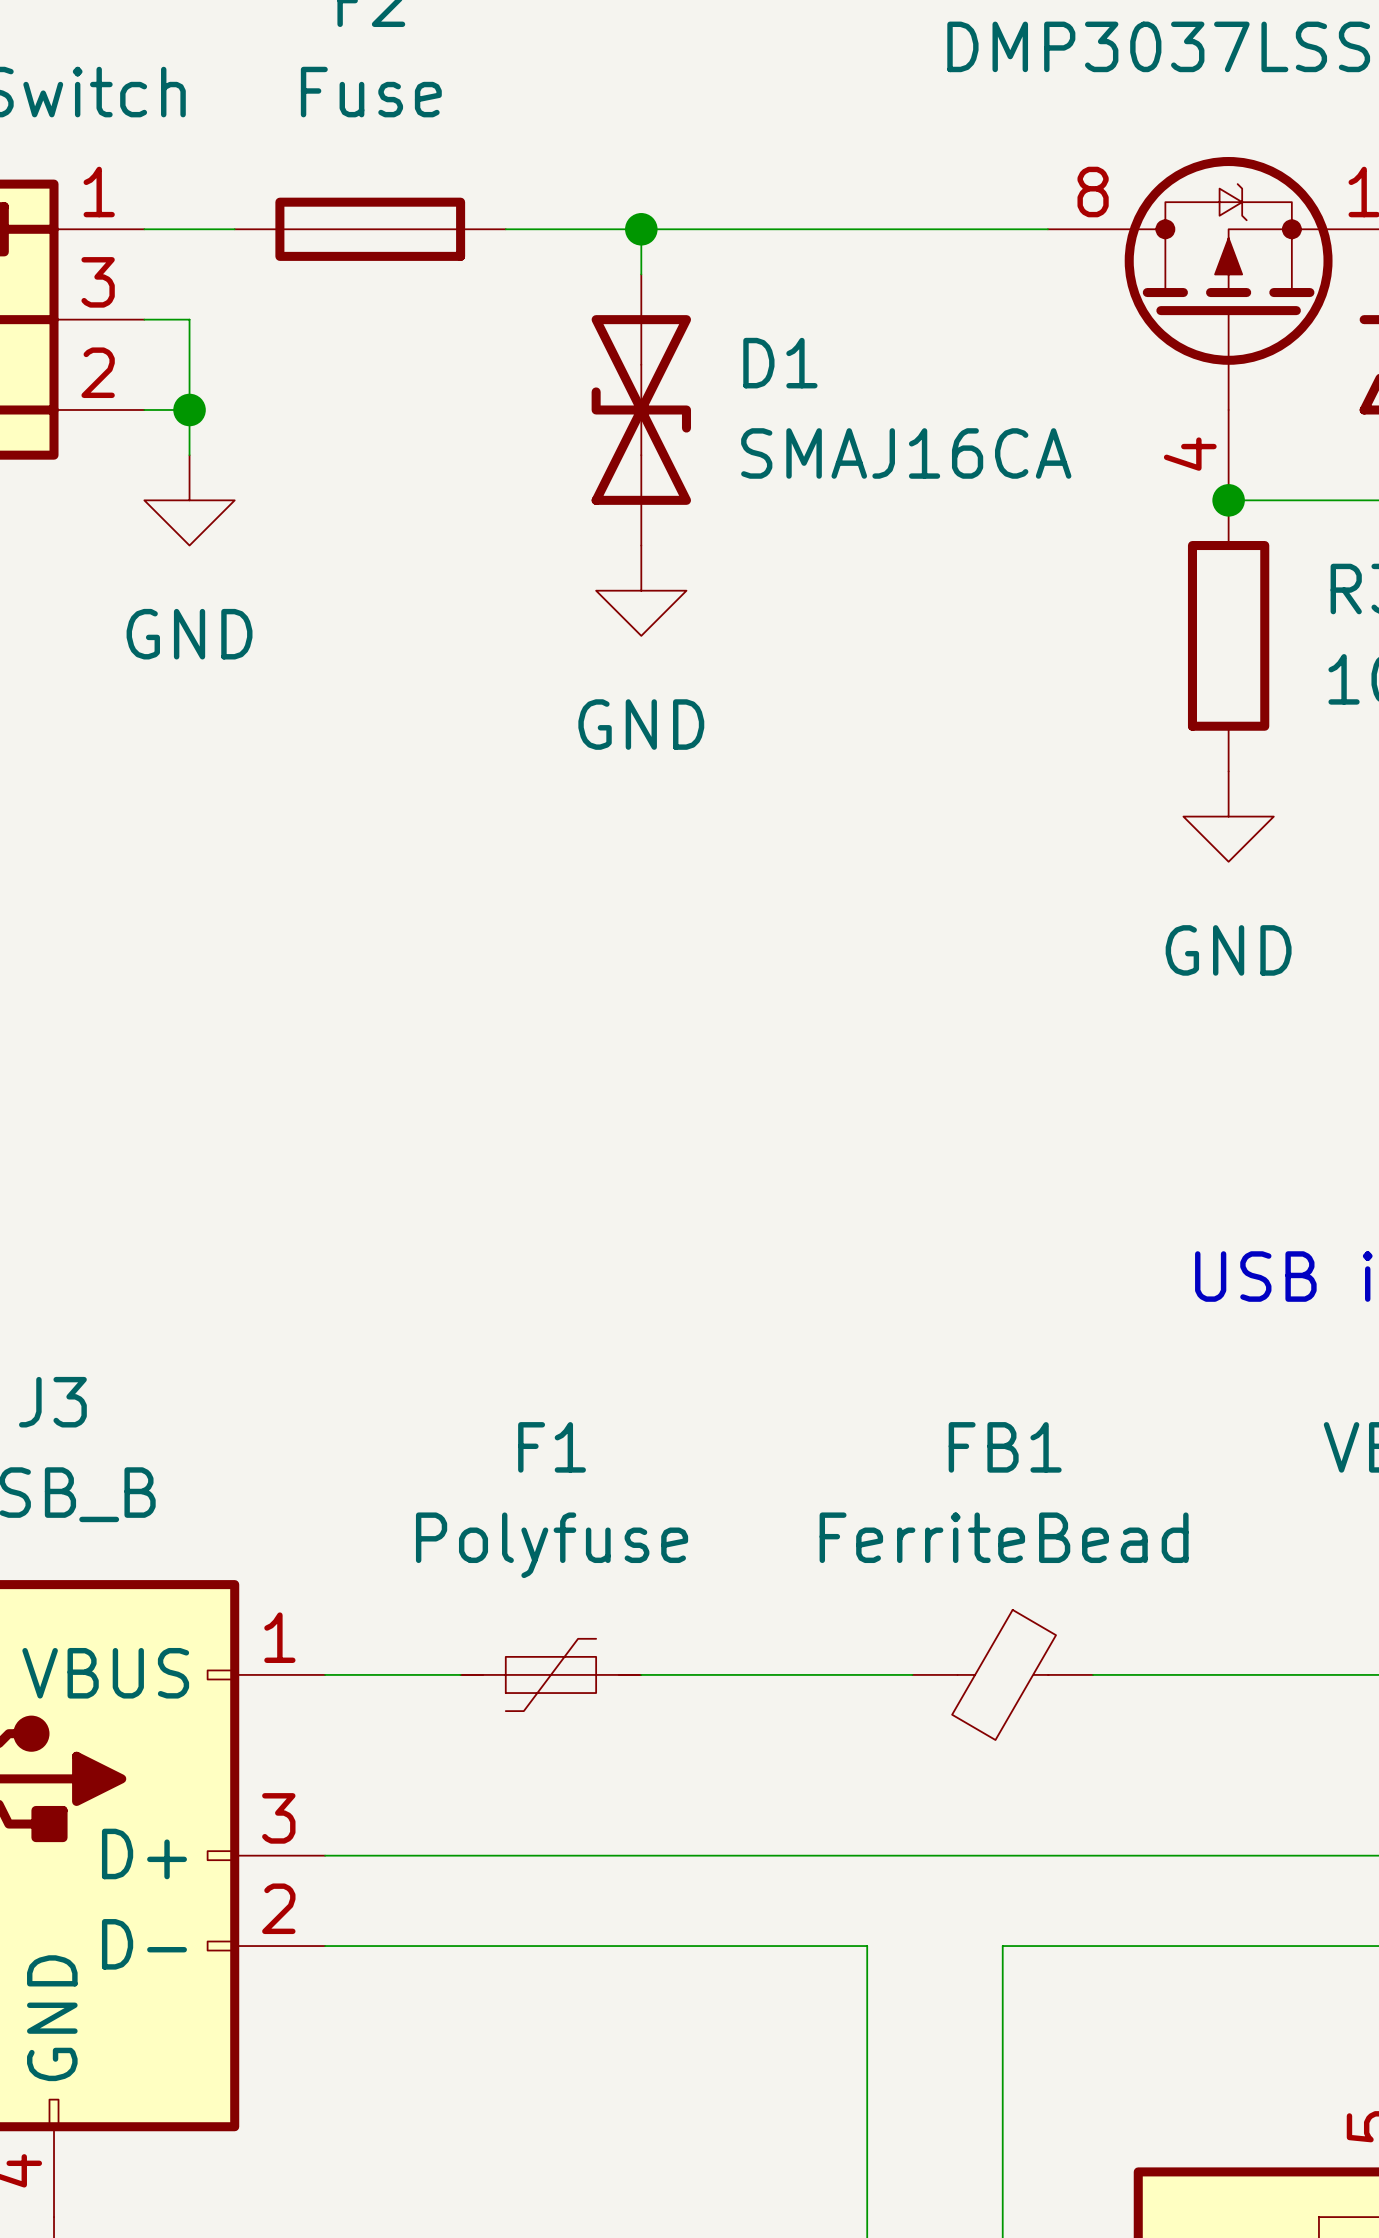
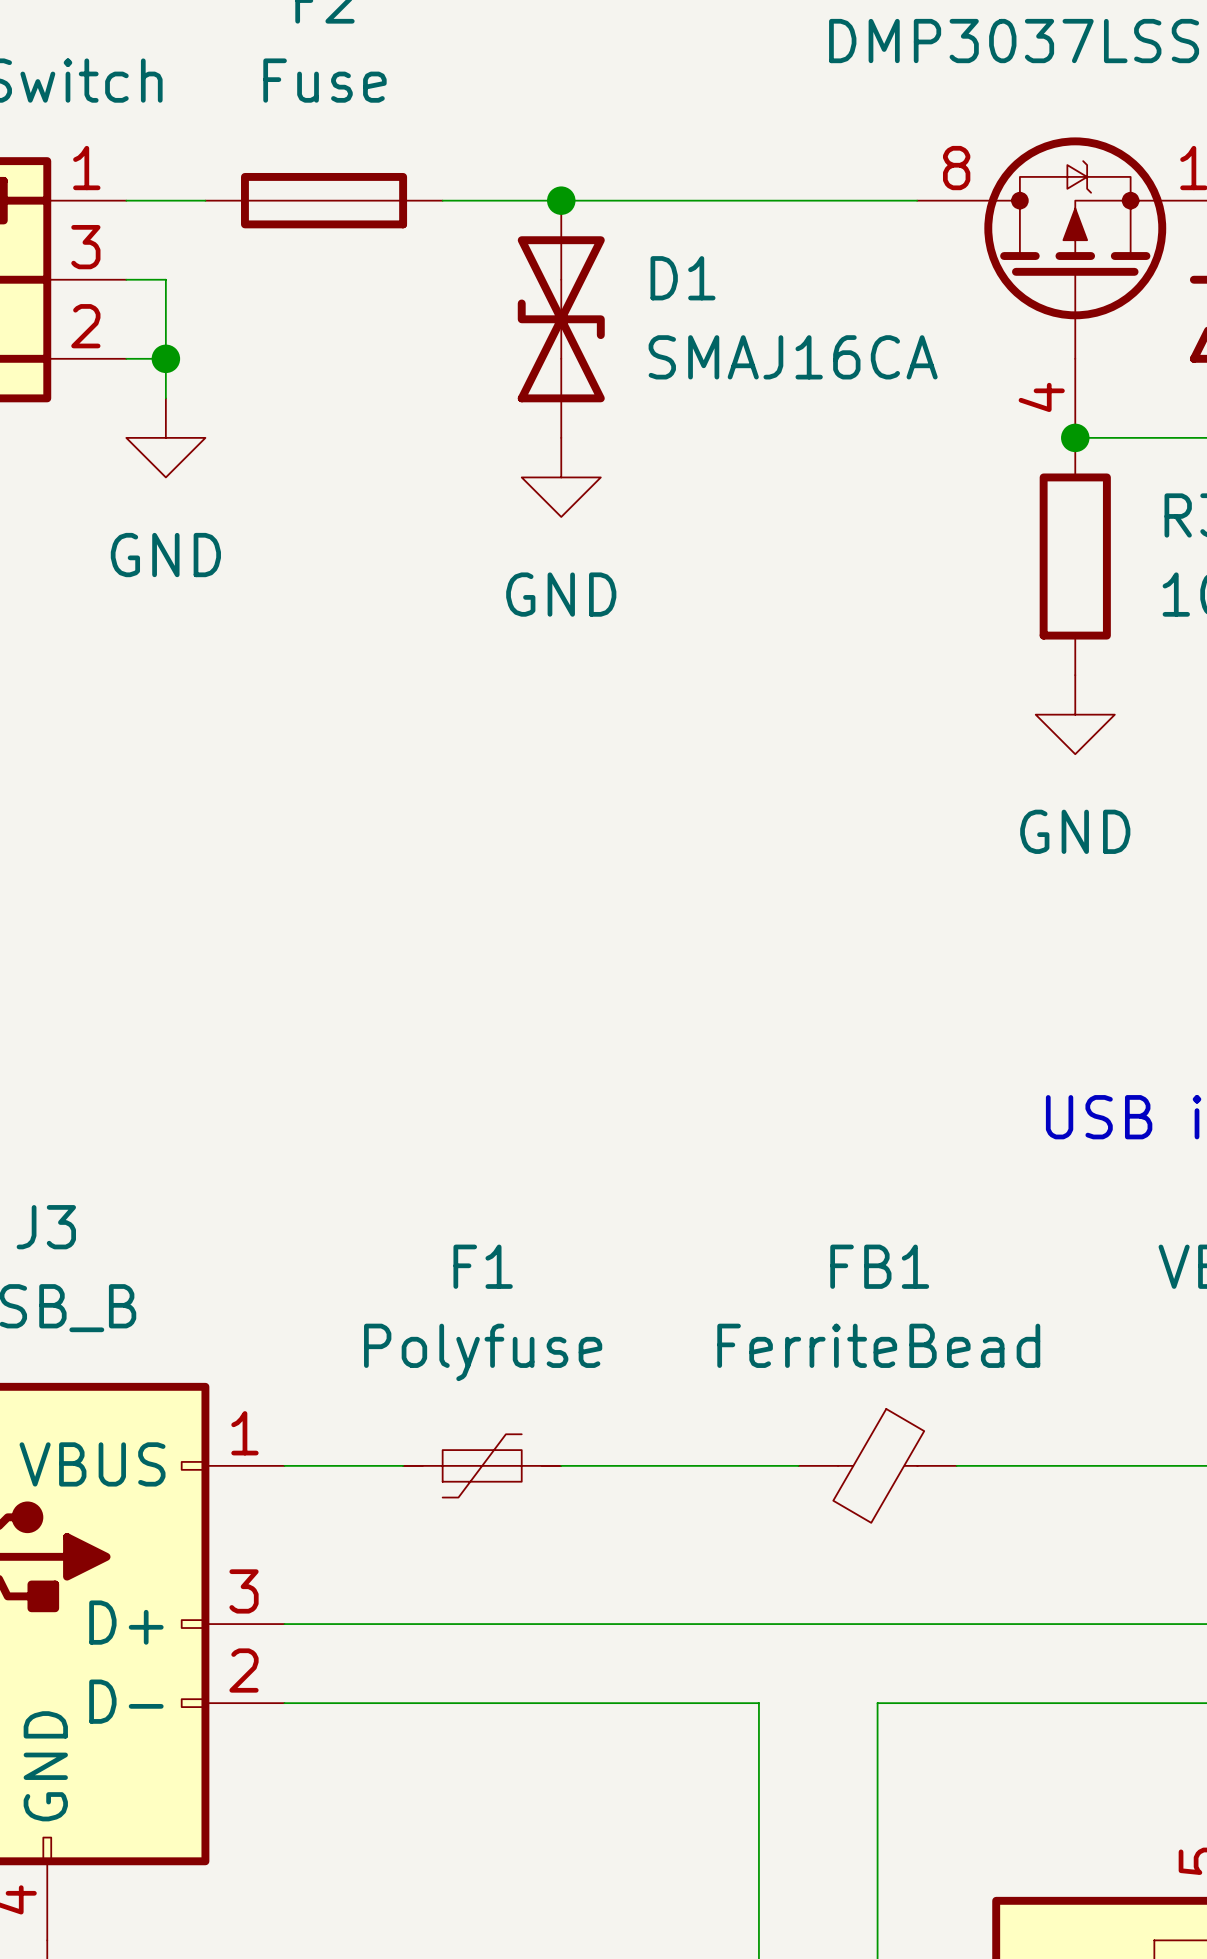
D1 position: (641, 409) -> (561, 319)
power symbol position: GND (641, 590) -> GND (561, 477)

